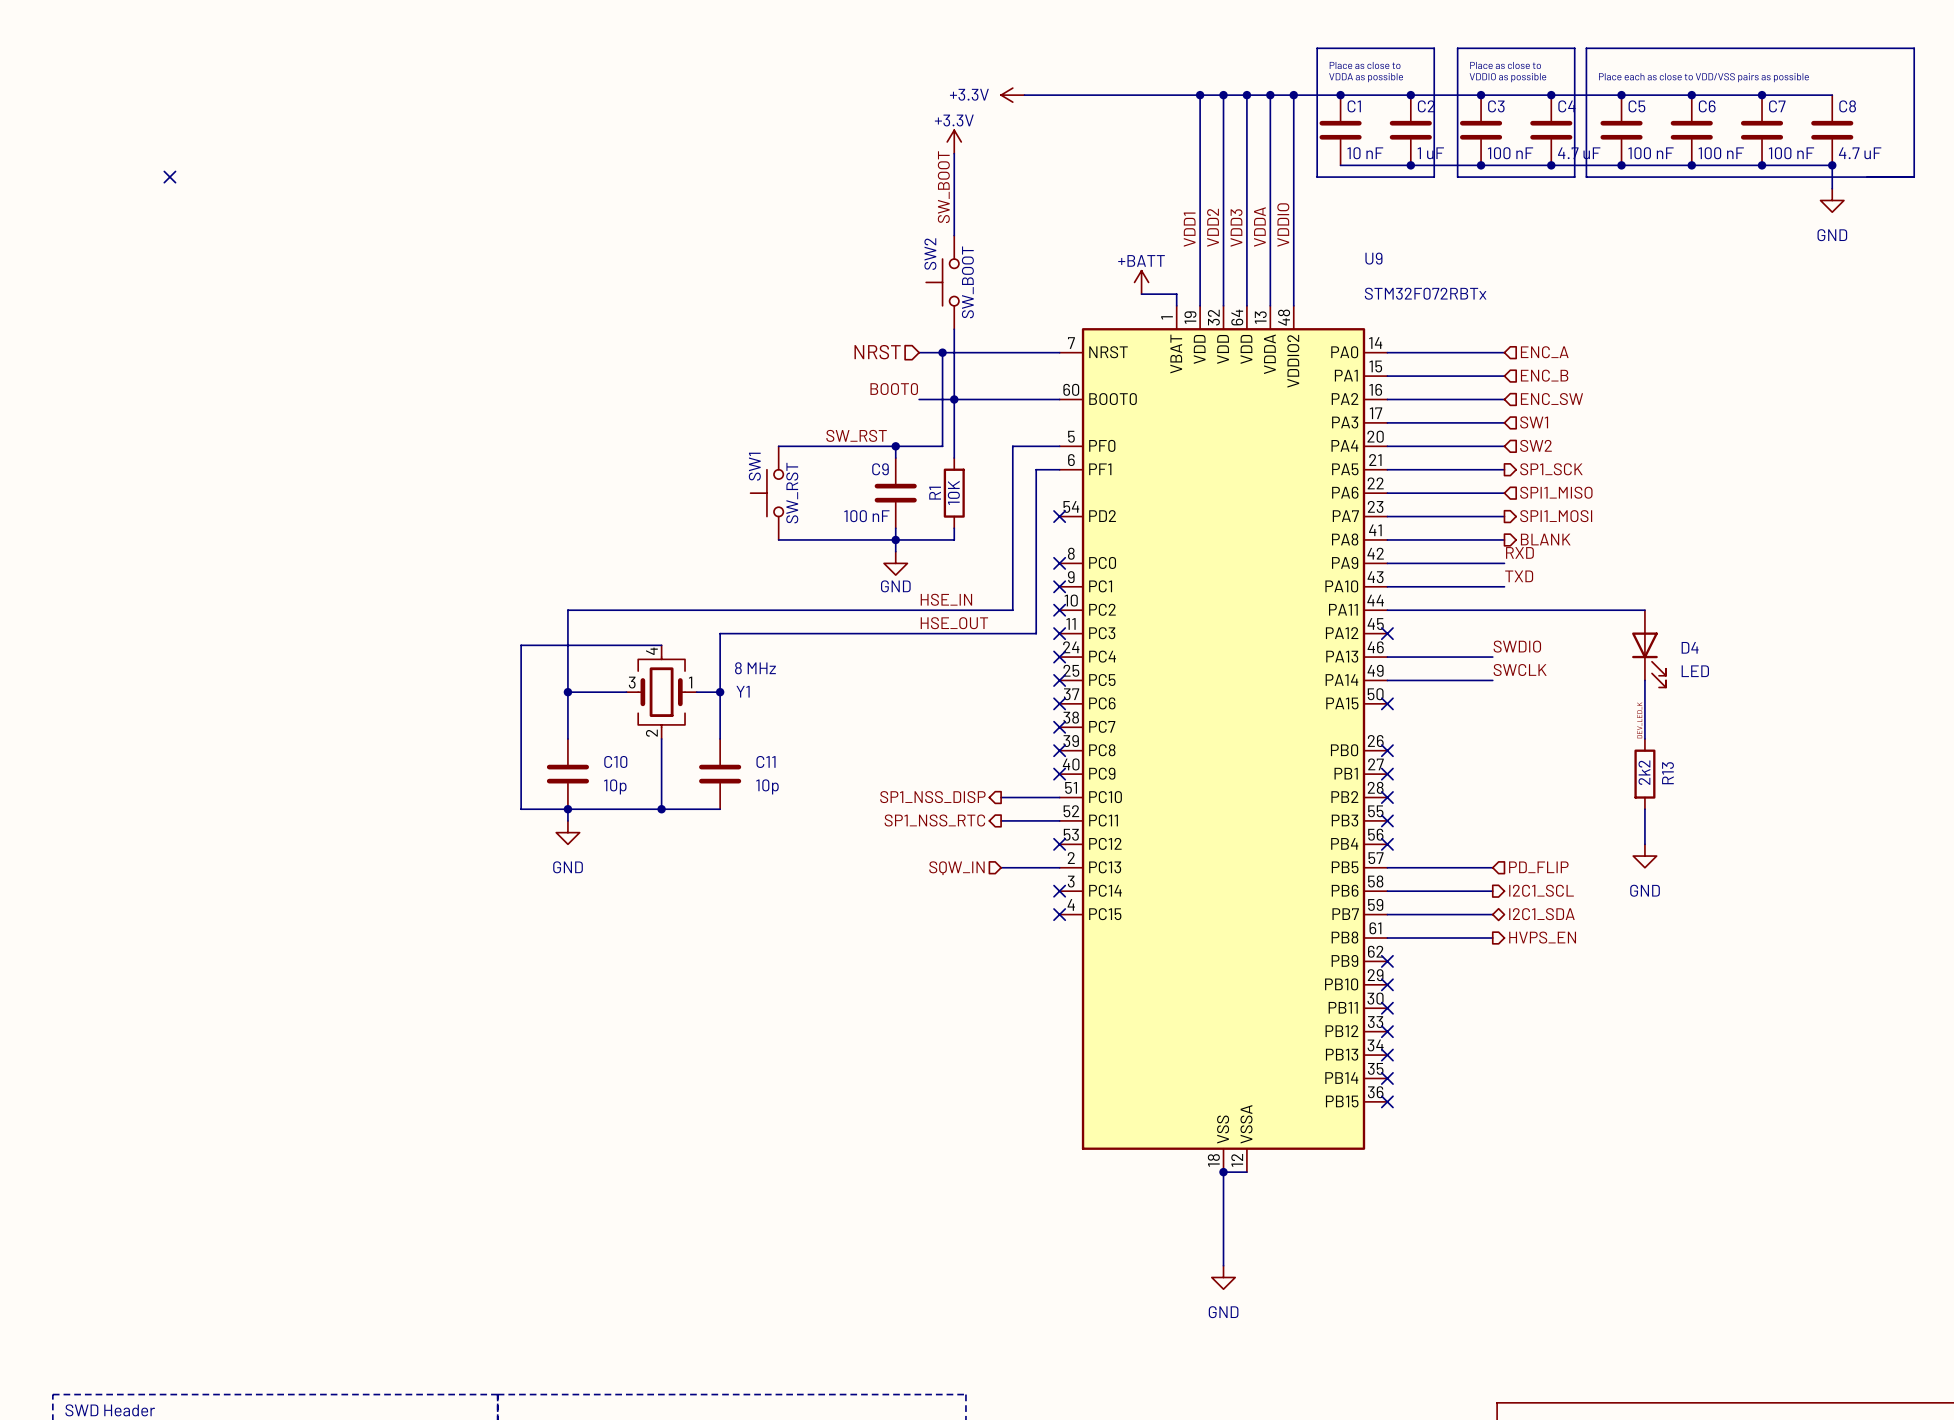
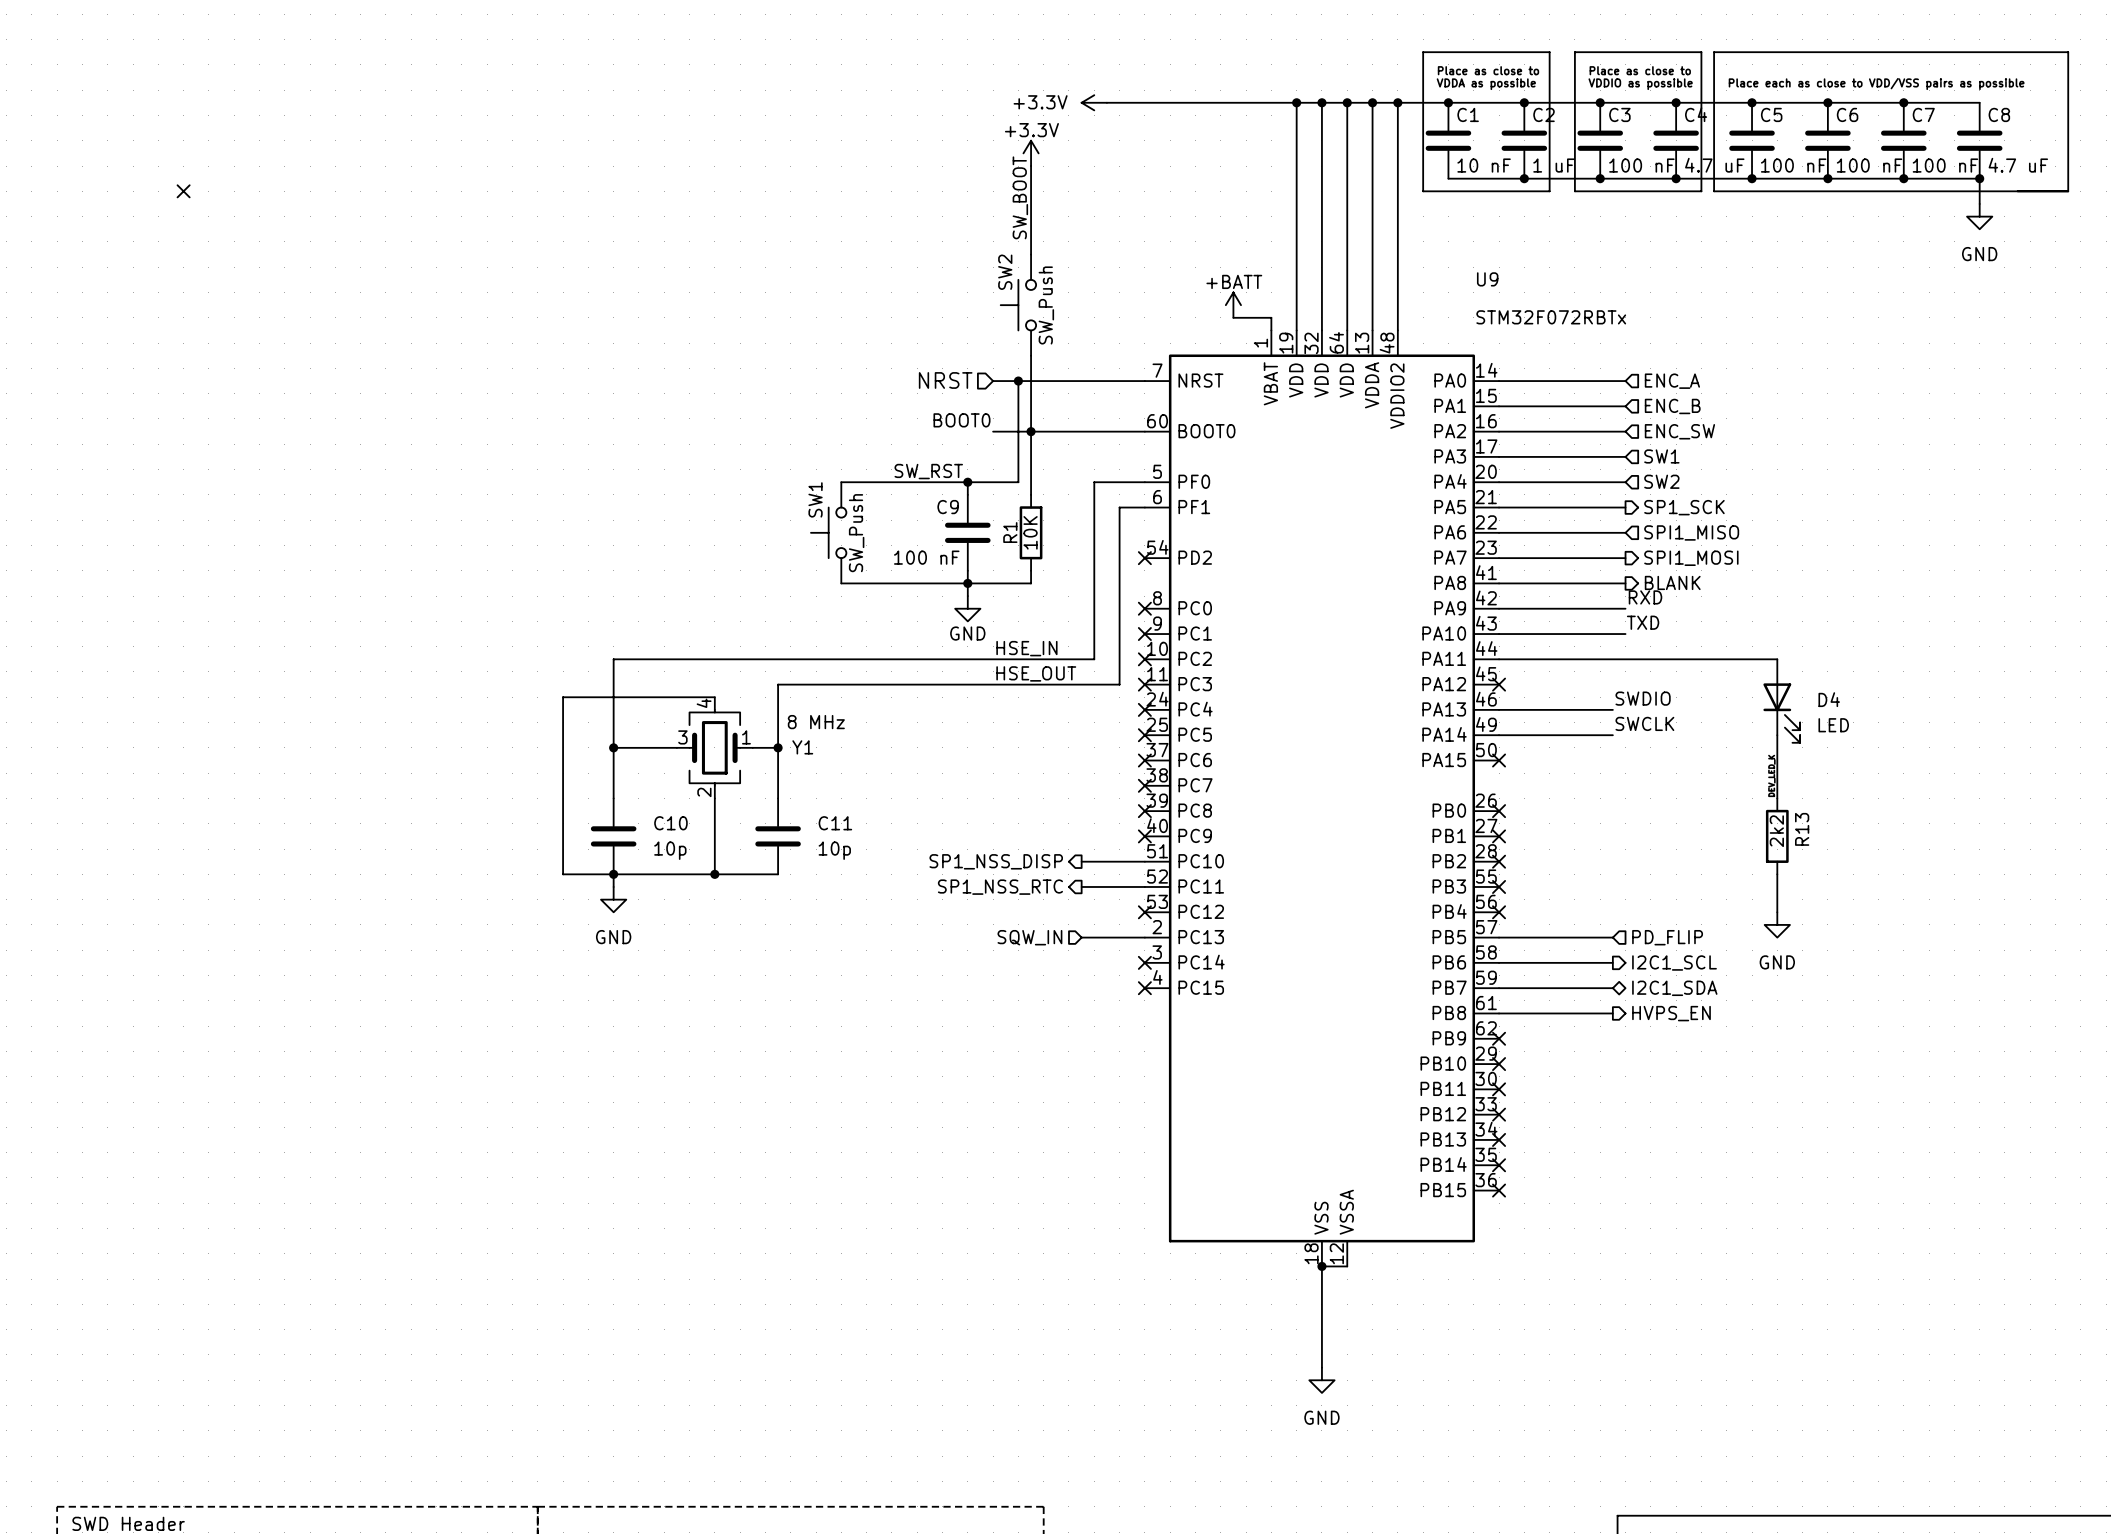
label: VDDIO (1283, 225) -> none
label: VDDA (1259, 226) -> none
label: VDD2 (1213, 227) -> none
label: VDD3 (1236, 227) -> none
label: VDD1 (1189, 229) -> none
SW2 value: SW_BOOT (967, 282) -> SW_Push (1046, 305)
SW1 value: SW_RST (792, 493) -> SW_Push (856, 533)

